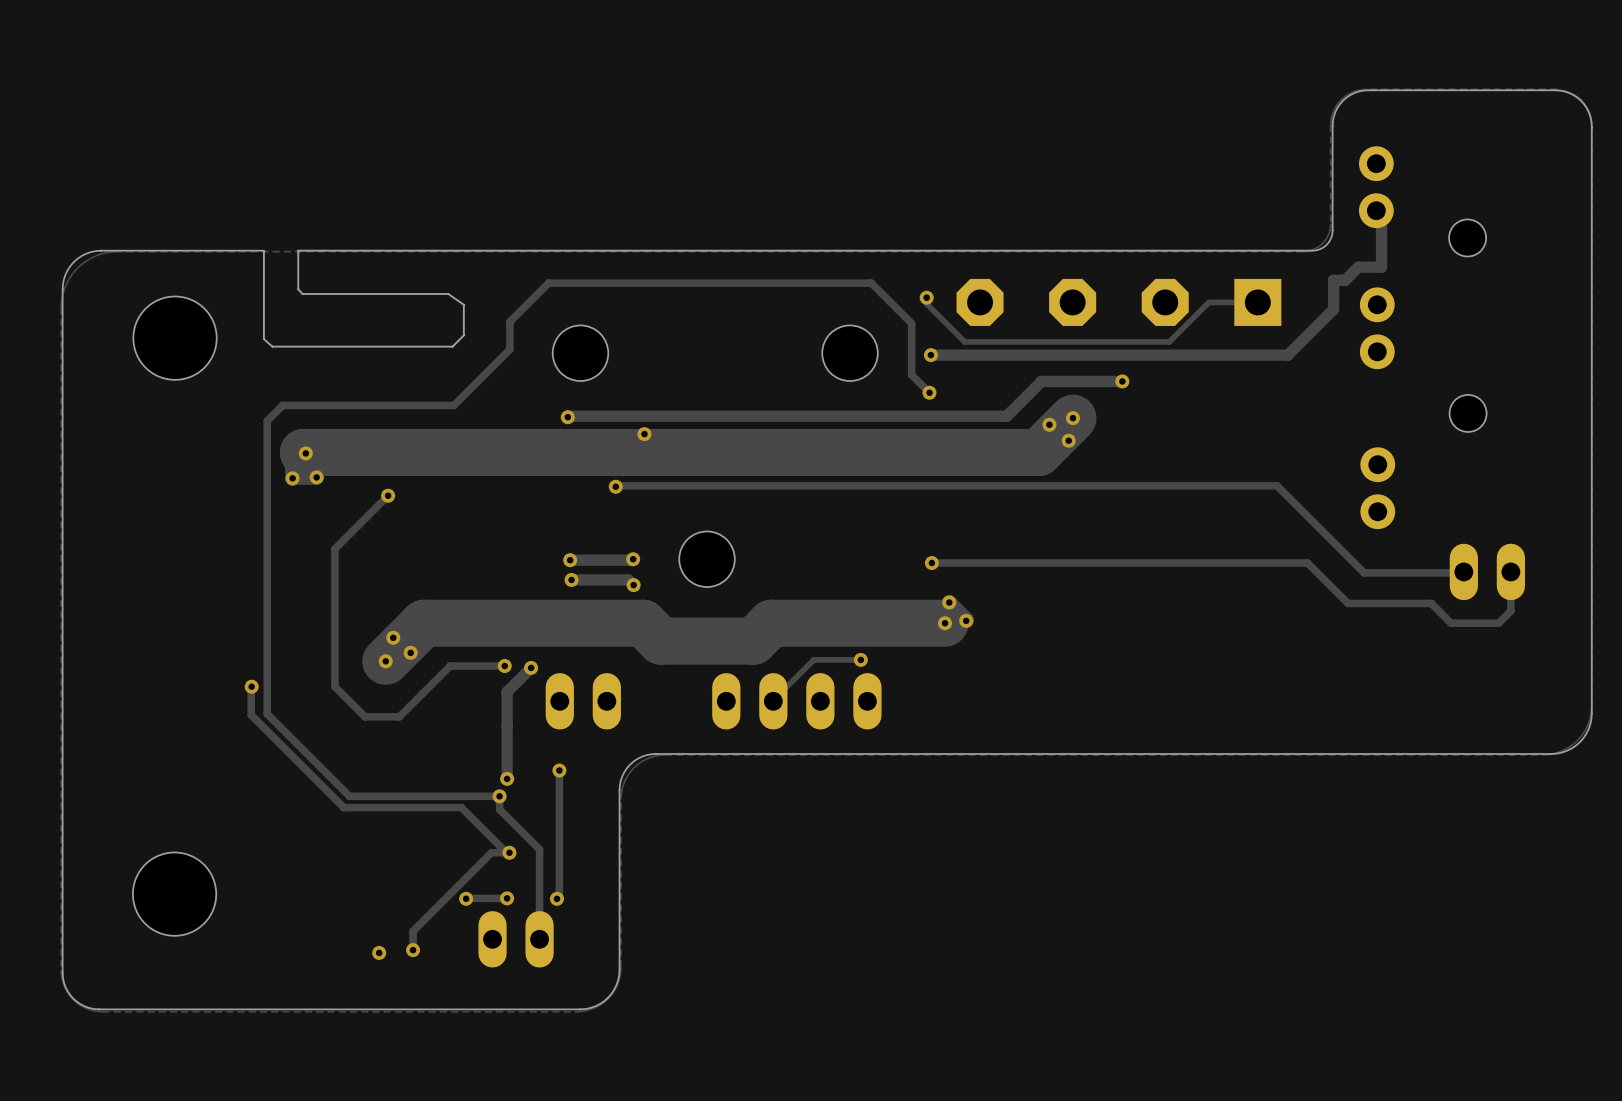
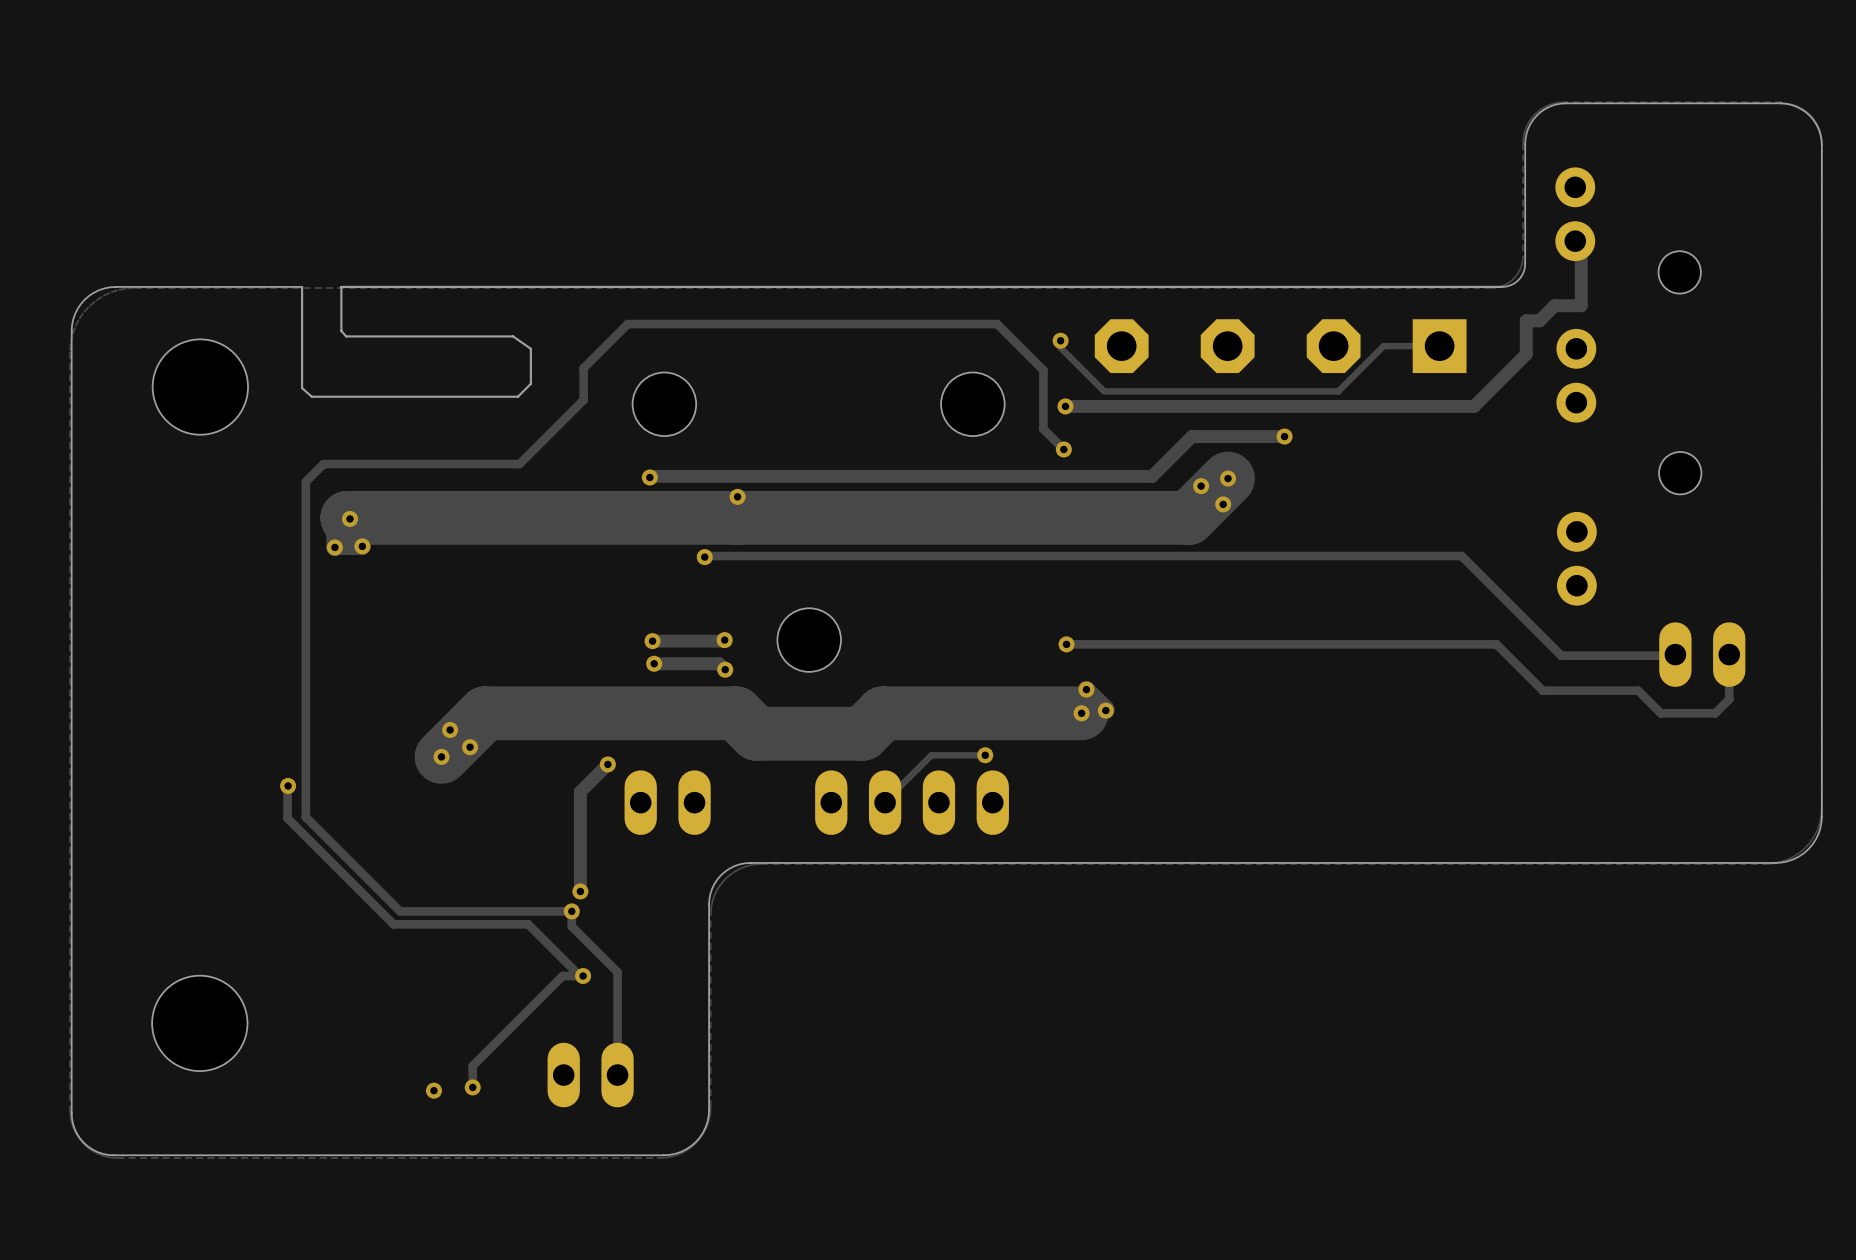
track: (388, 495) (334, 548) (334, 686) (365, 716) (399, 716) (450, 666) (504, 666) -> none
via: (388, 495) -> none
via: (504, 666) -> none
track: (559, 770) (559, 896) (556, 898) -> none
via: (559, 770) -> none
via: (466, 898) -> none
track: (507, 898) (466, 898) -> none
via: (507, 898) -> none
via: (556, 898) -> none

